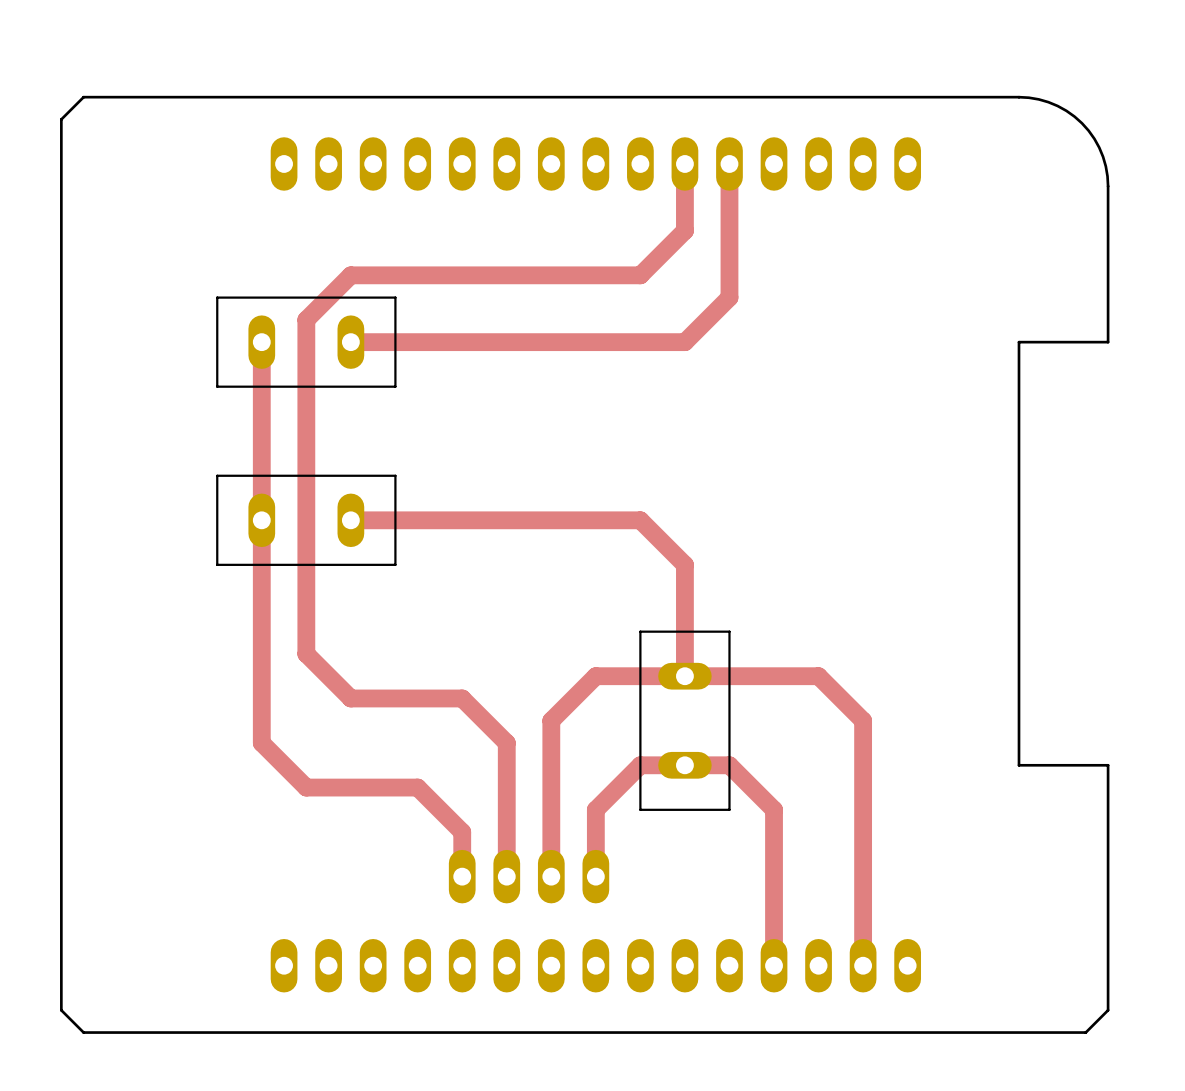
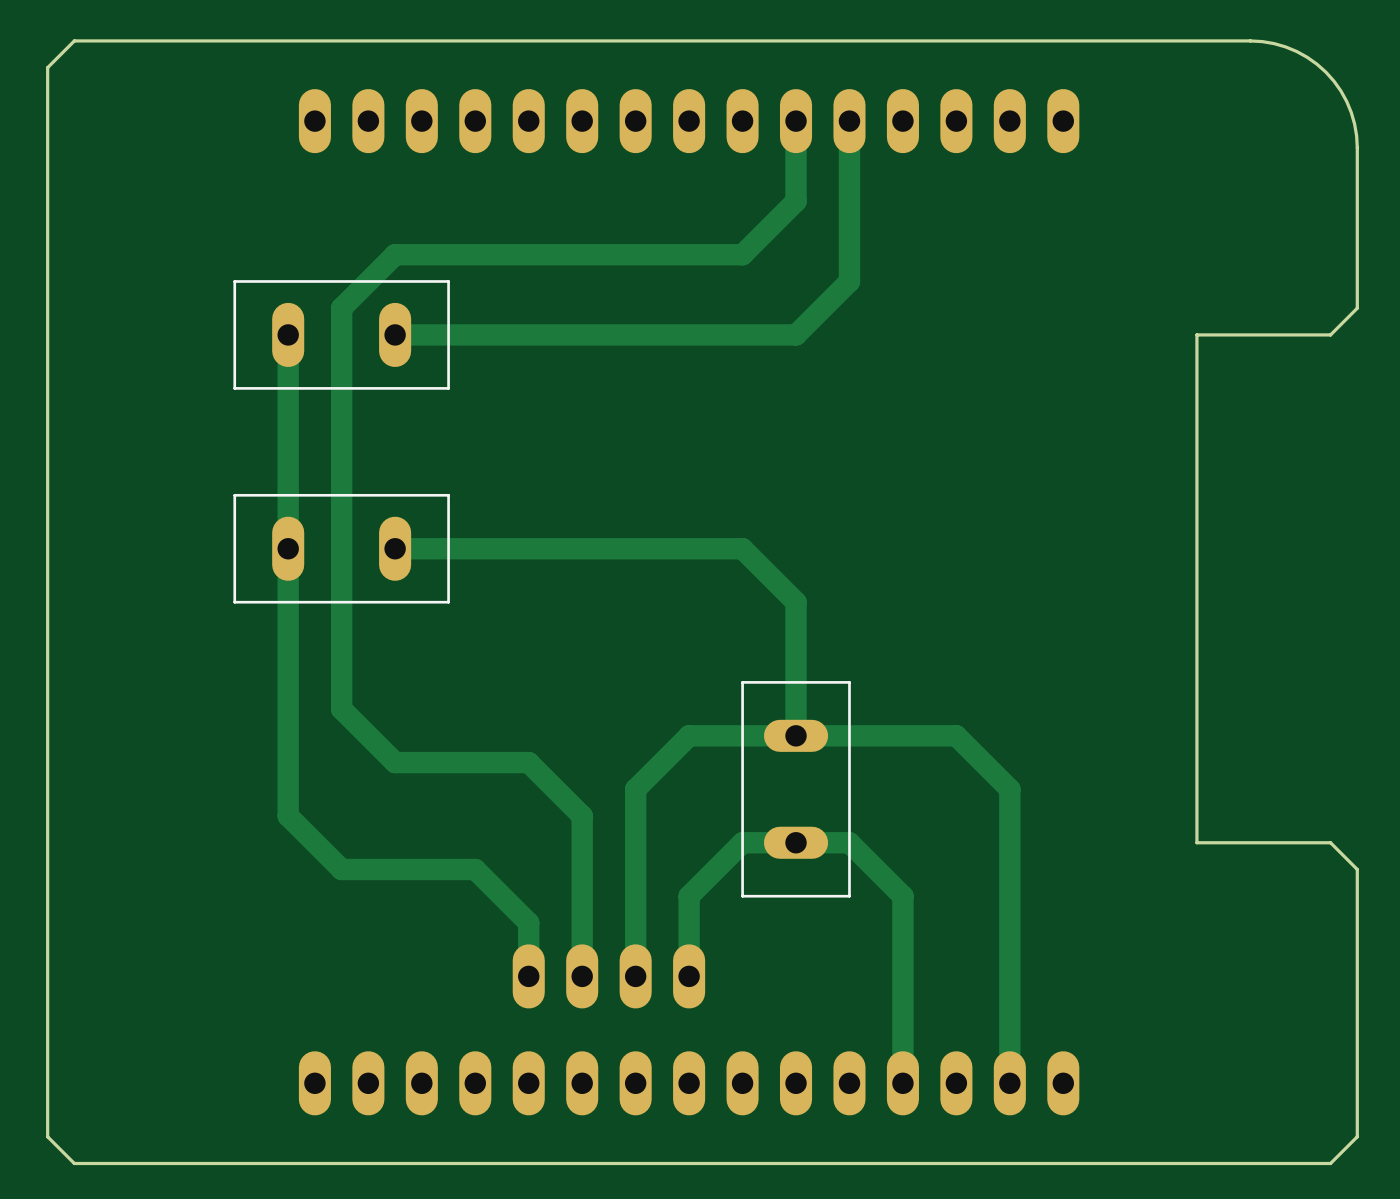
board edge: (1018, 97) (1038, 99) (1066, 110) (1088, 130) (1103, 156) (1108, 186) (1108, 342) -> (1196, 40) (1262, 41) (1296, 51) (1325, 72) (1340, 90) (1351, 112) (1357, 147) (1357, 308) (1330, 334) (1303, 334)
board edge: (1108, 765) (1108, 1010) (1085, 1032) -> (1303, 842) (1330, 842) (1357, 869) (1357, 1136) (1330, 1163) (1277, 1163)

